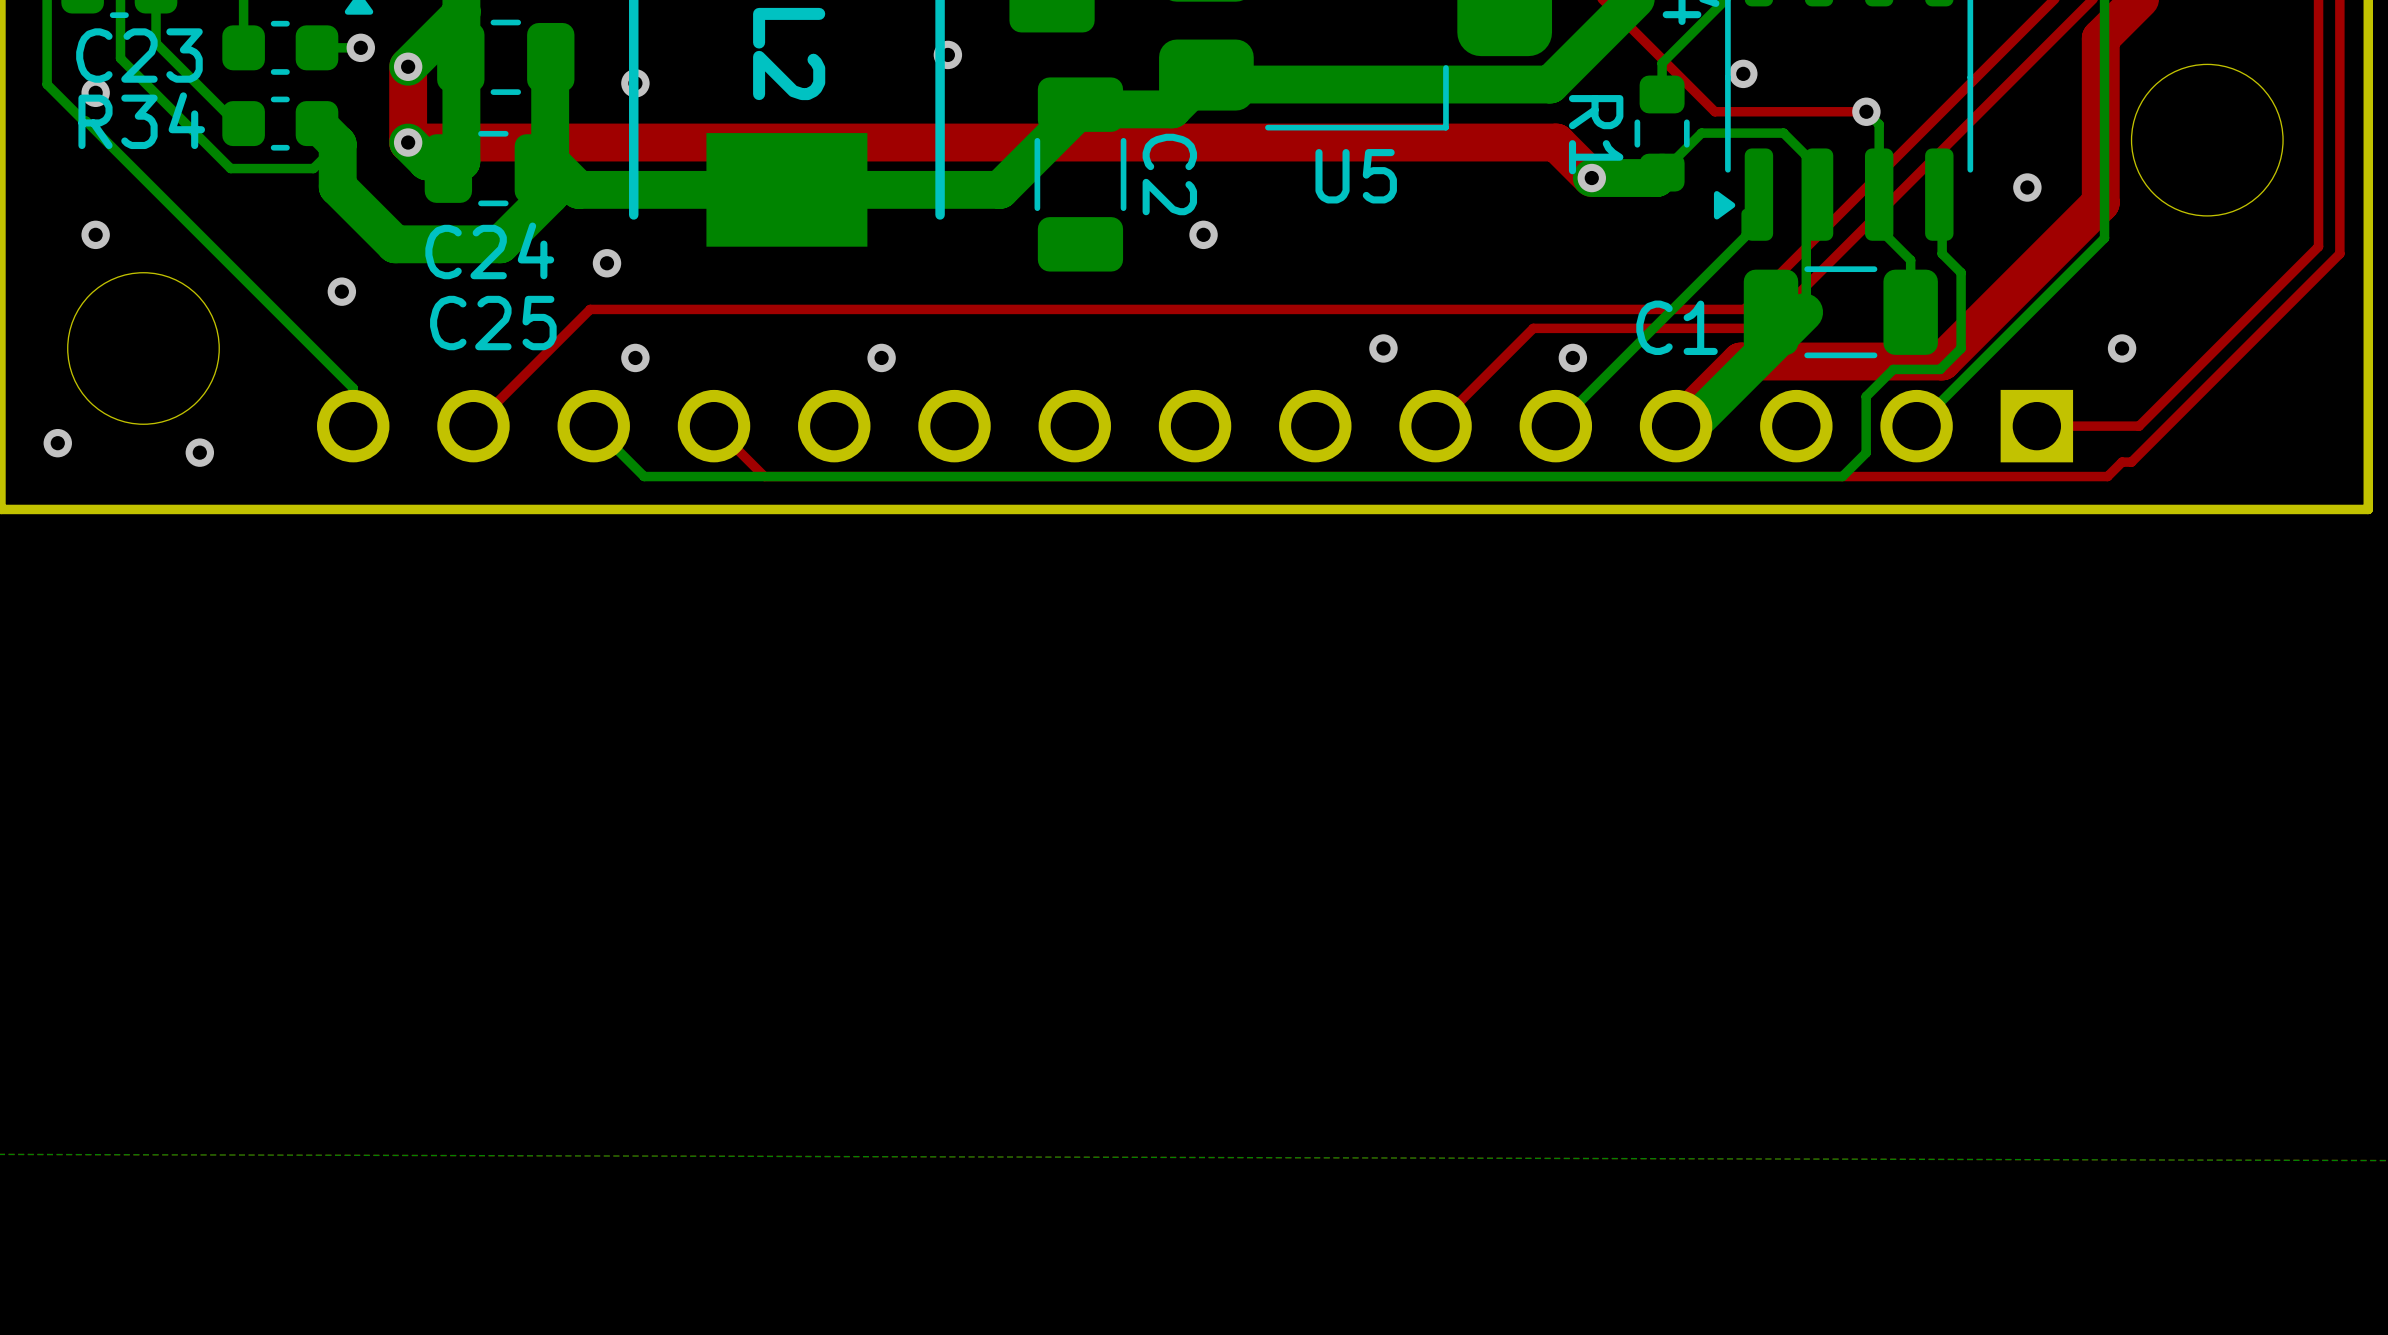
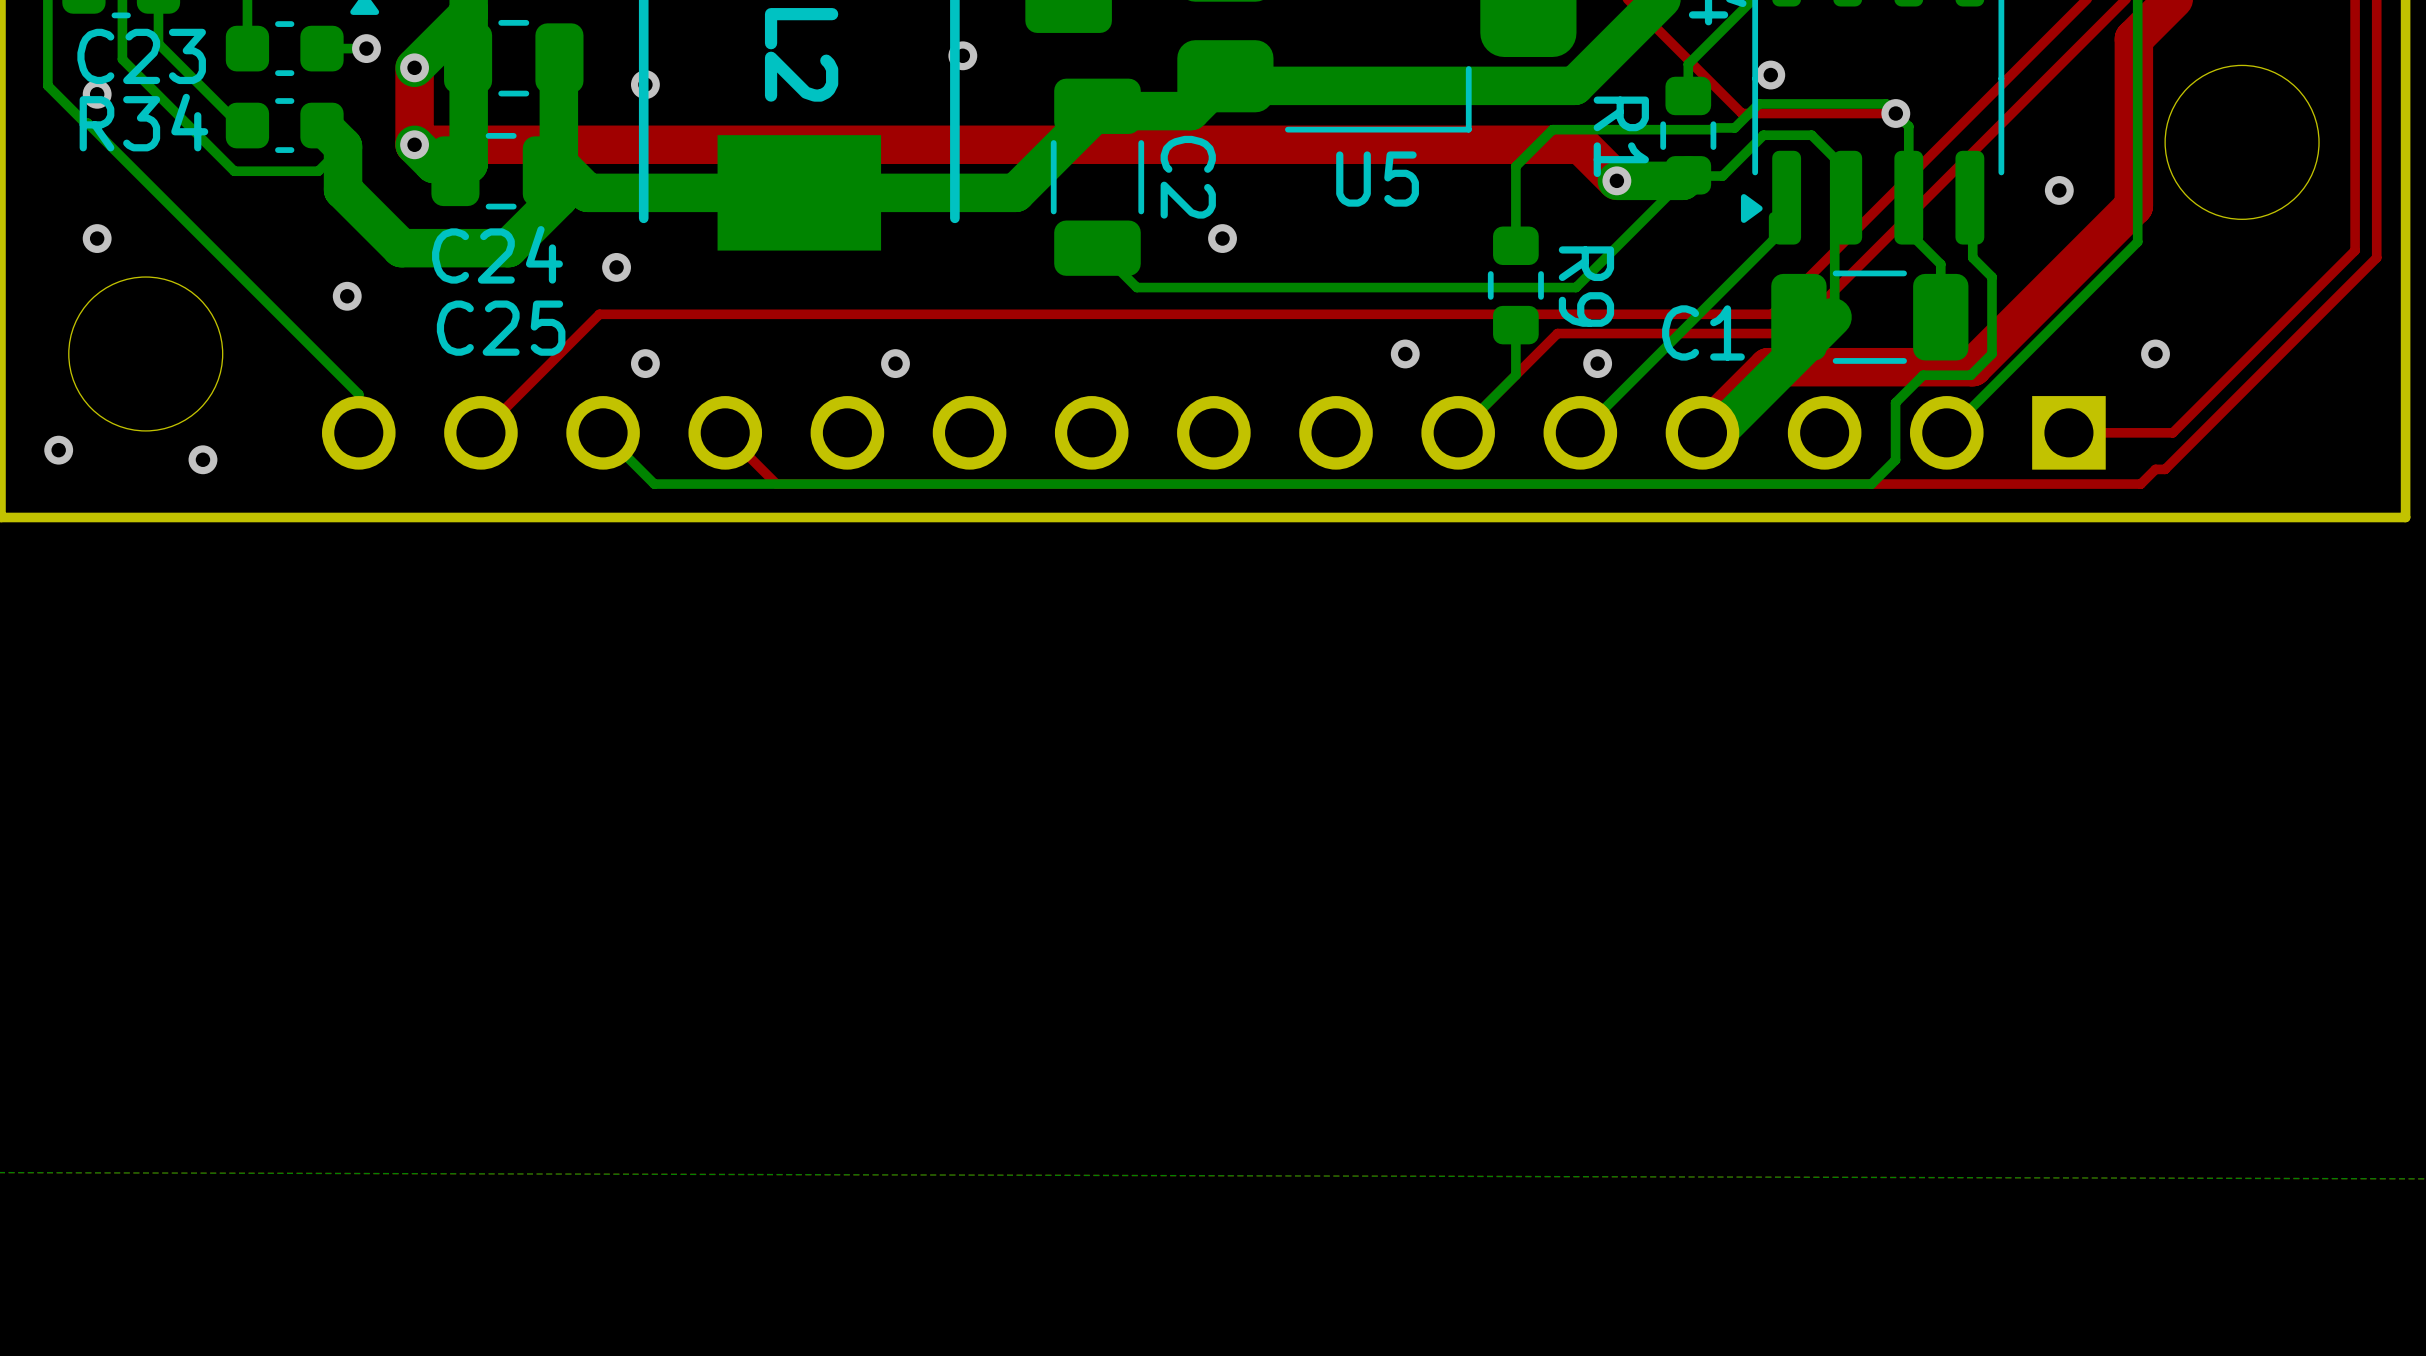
bottom track: none -> (1895, 113) (1886, 103) (1758, 103) (1734, 127) (1713, 127) (1711, 129) (1552, 129) (1515, 166) (1515, 245)
bottom track: (1736, 133) (1701, 133) (1662, 172) -> (1763, 135) (1722, 176) (1688, 175) (1576, 287) (1136, 287) (1097, 248)
R9: none -> (1515, 285)
bottom track: none -> (1515, 325) (1515, 375) (1458, 432)

